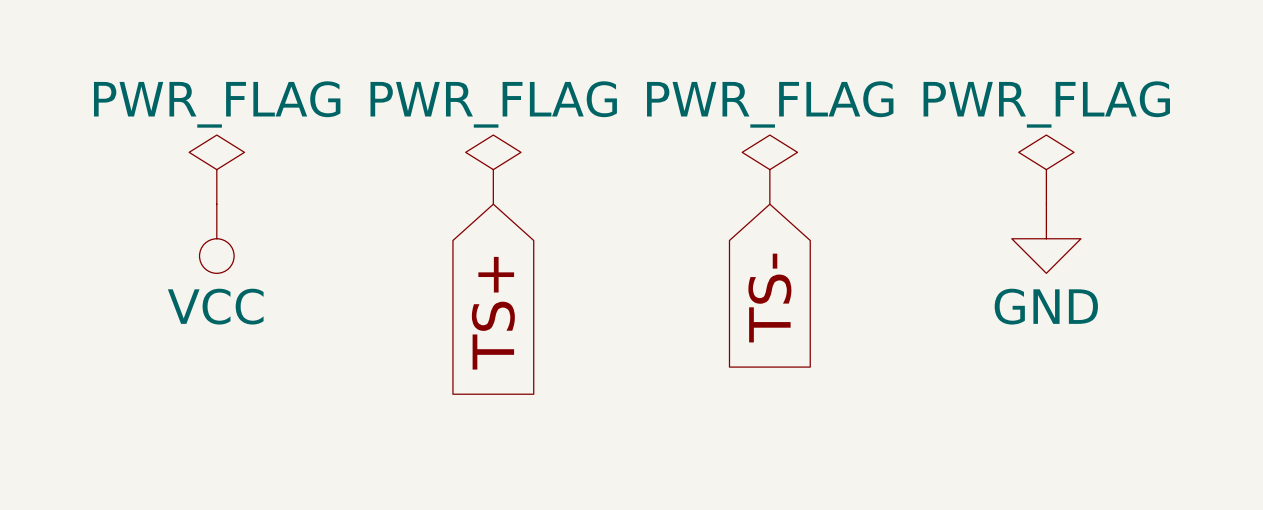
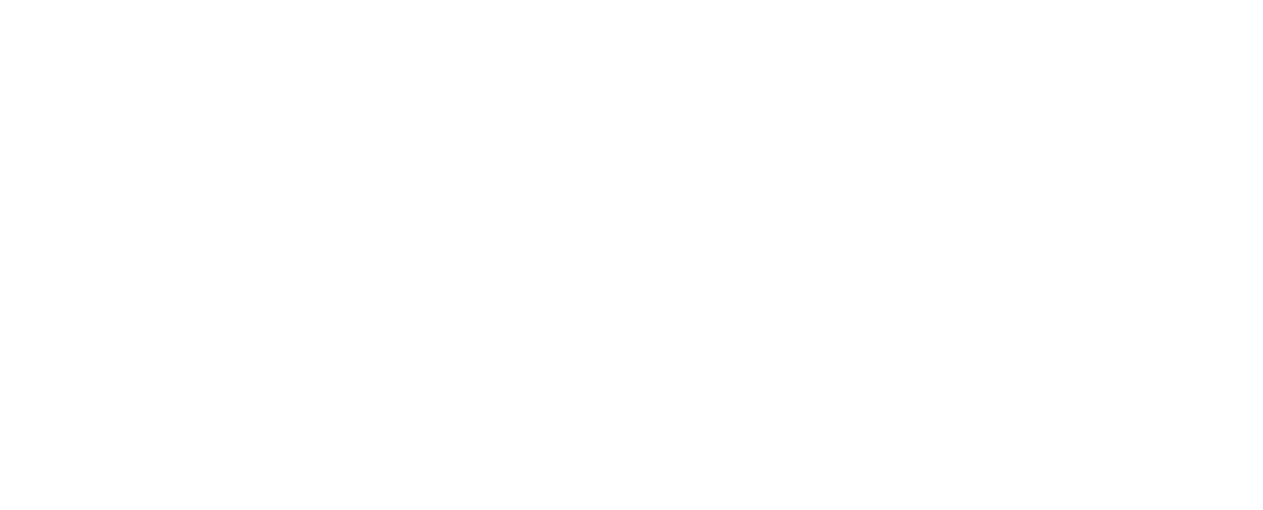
power symbol: PWR_FLAG (216, 169) -> none
power symbol: PWR_FLAG (493, 169) -> none
power symbol: PWR_FLAG (769, 169) -> none
power symbol: PWR_FLAG (1046, 169) -> none
power symbol: VCC (216, 238) -> none
power symbol: GND (1046, 238) -> none
global label: TS- (769, 298) -> none
global label: TS+ (493, 313) -> none

